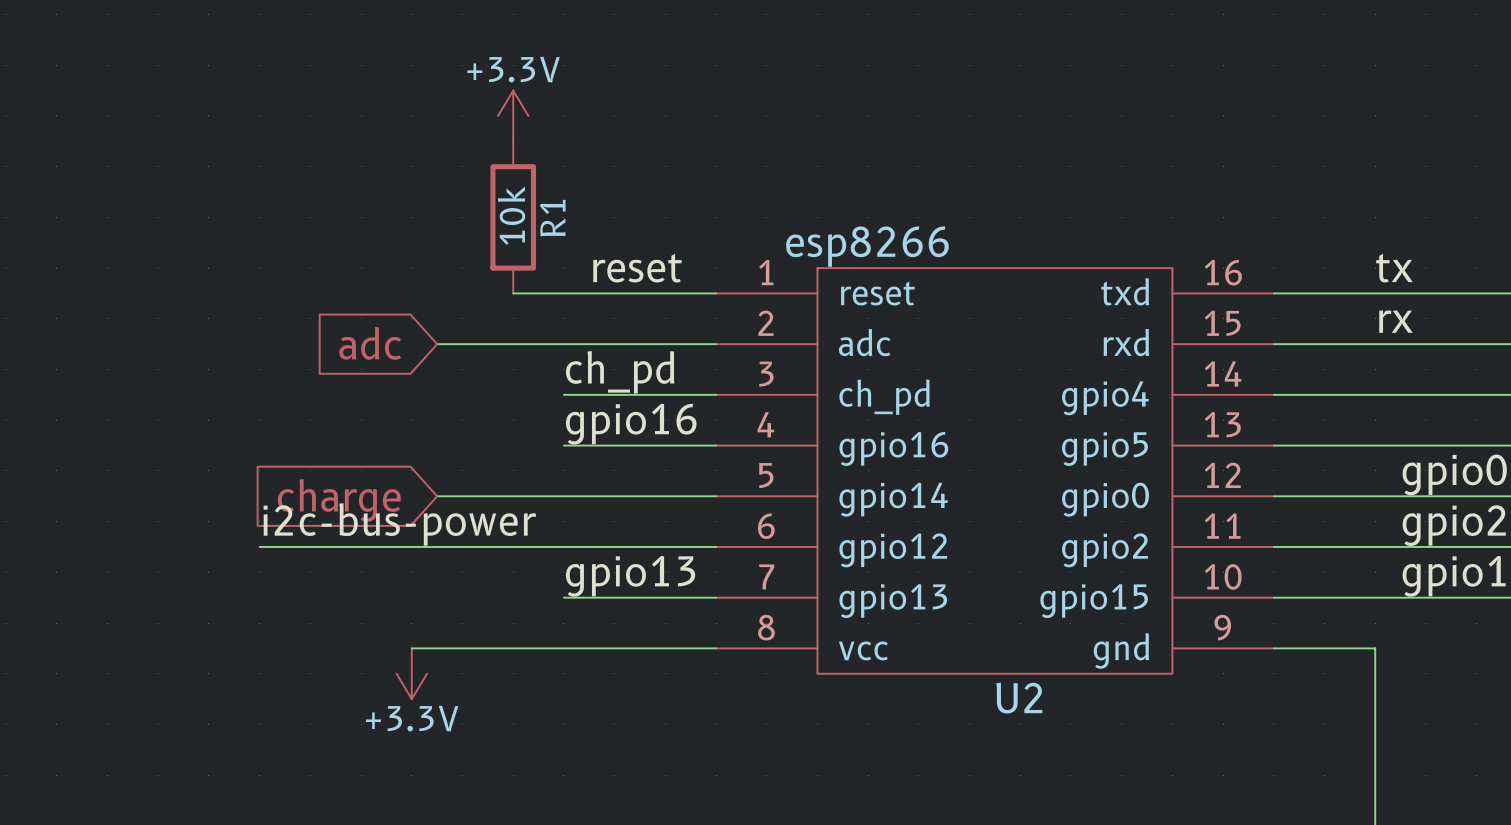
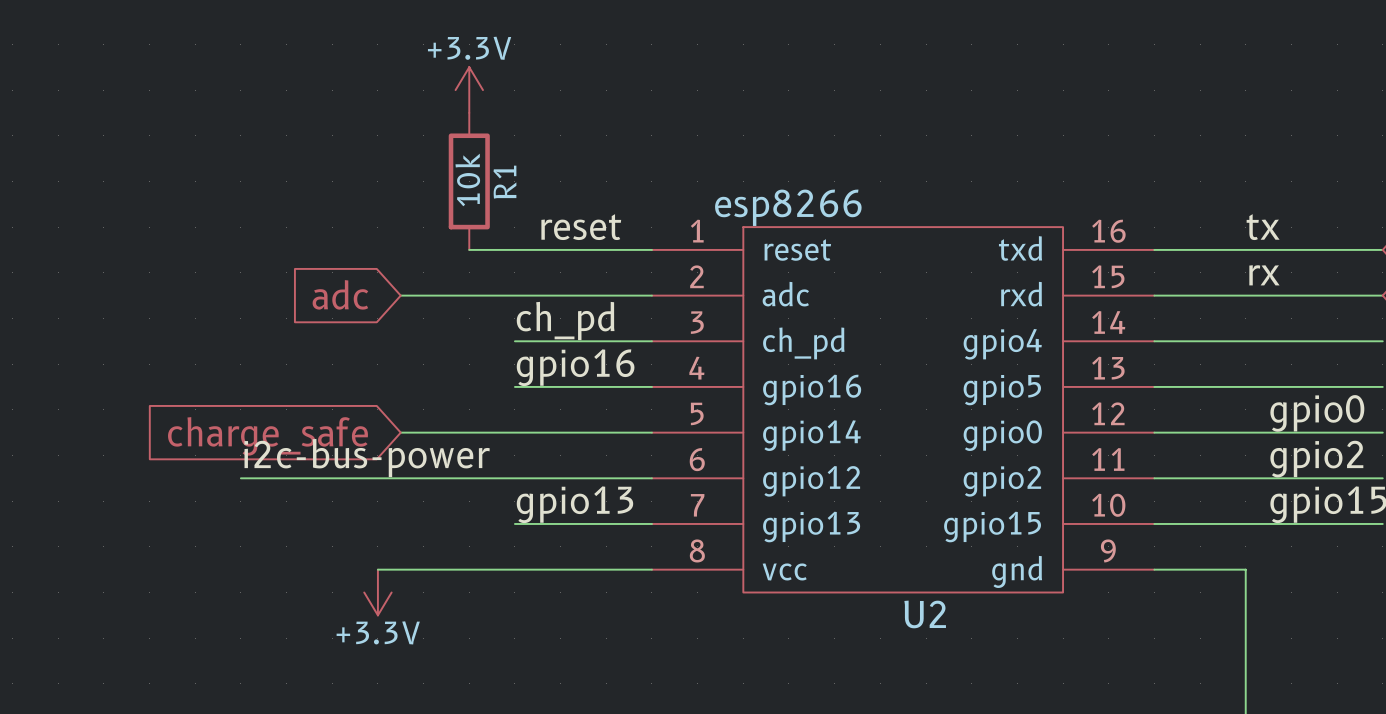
global label: charge (339, 500) -> charge_safe (267, 436)

